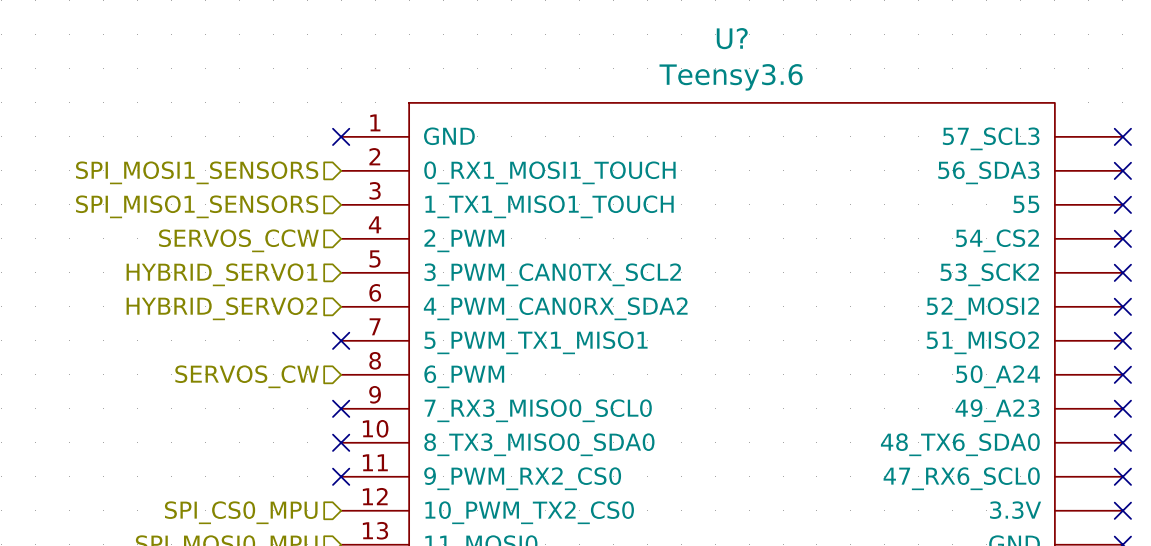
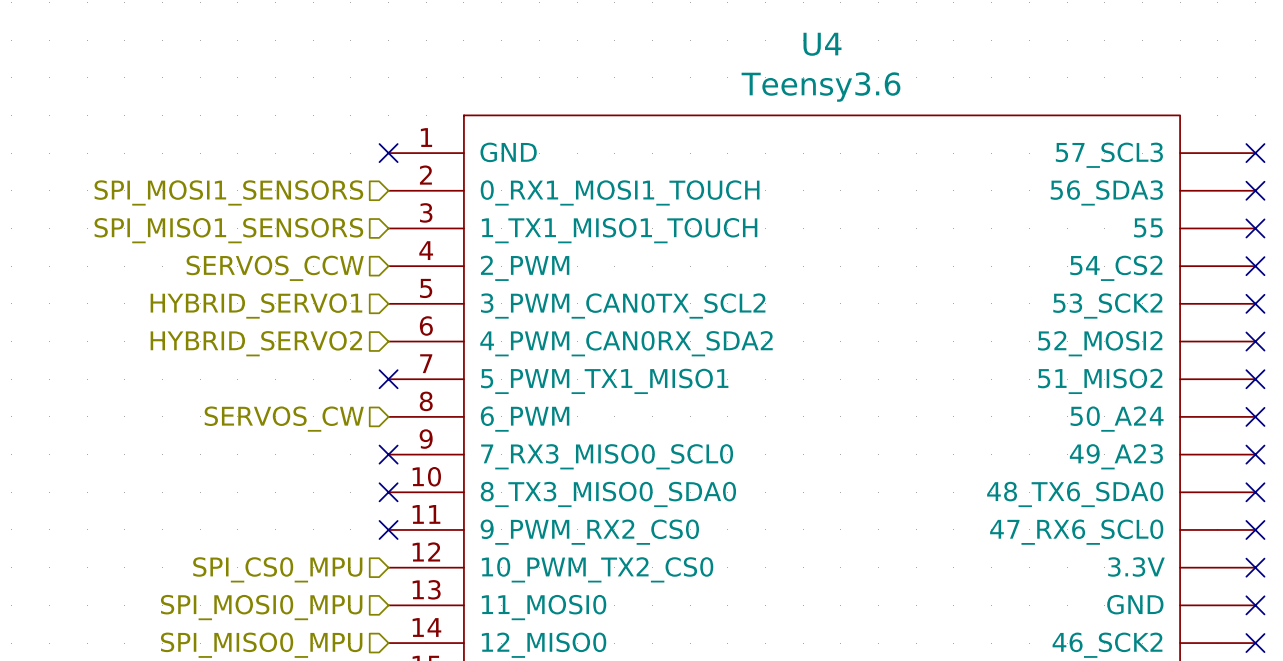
U? name: U? (732, 38) -> U4 (822, 44)

